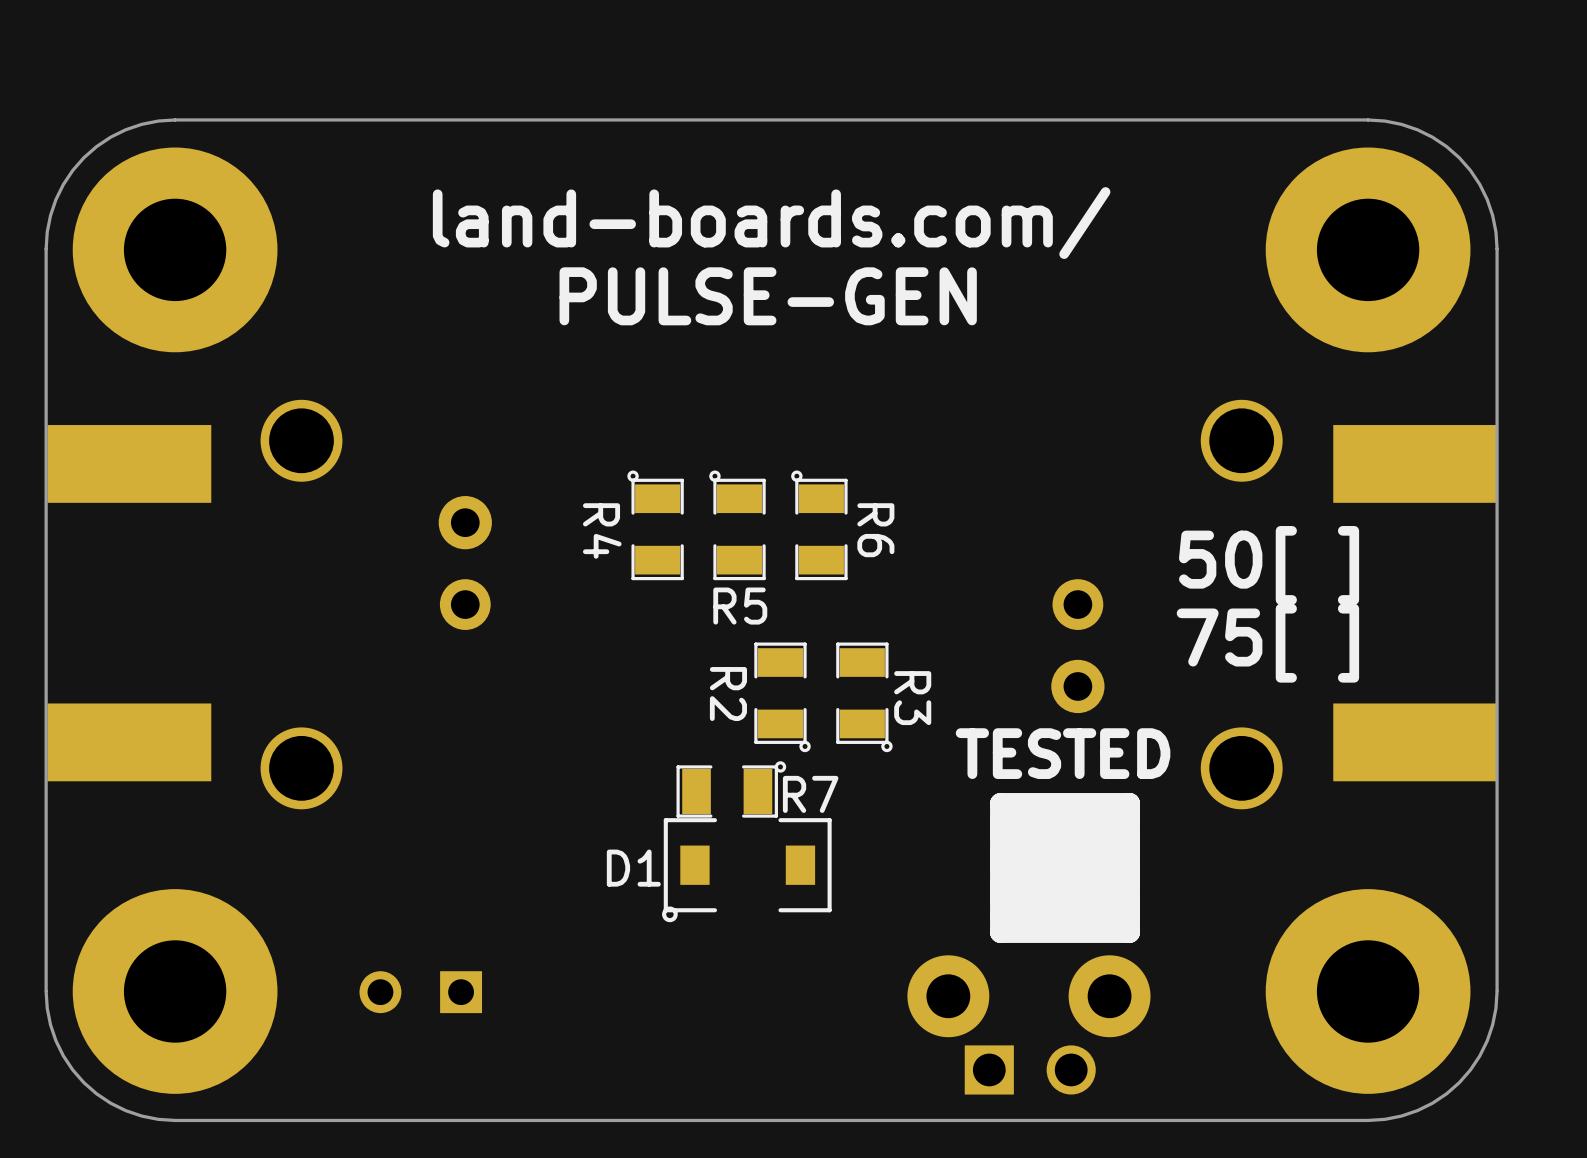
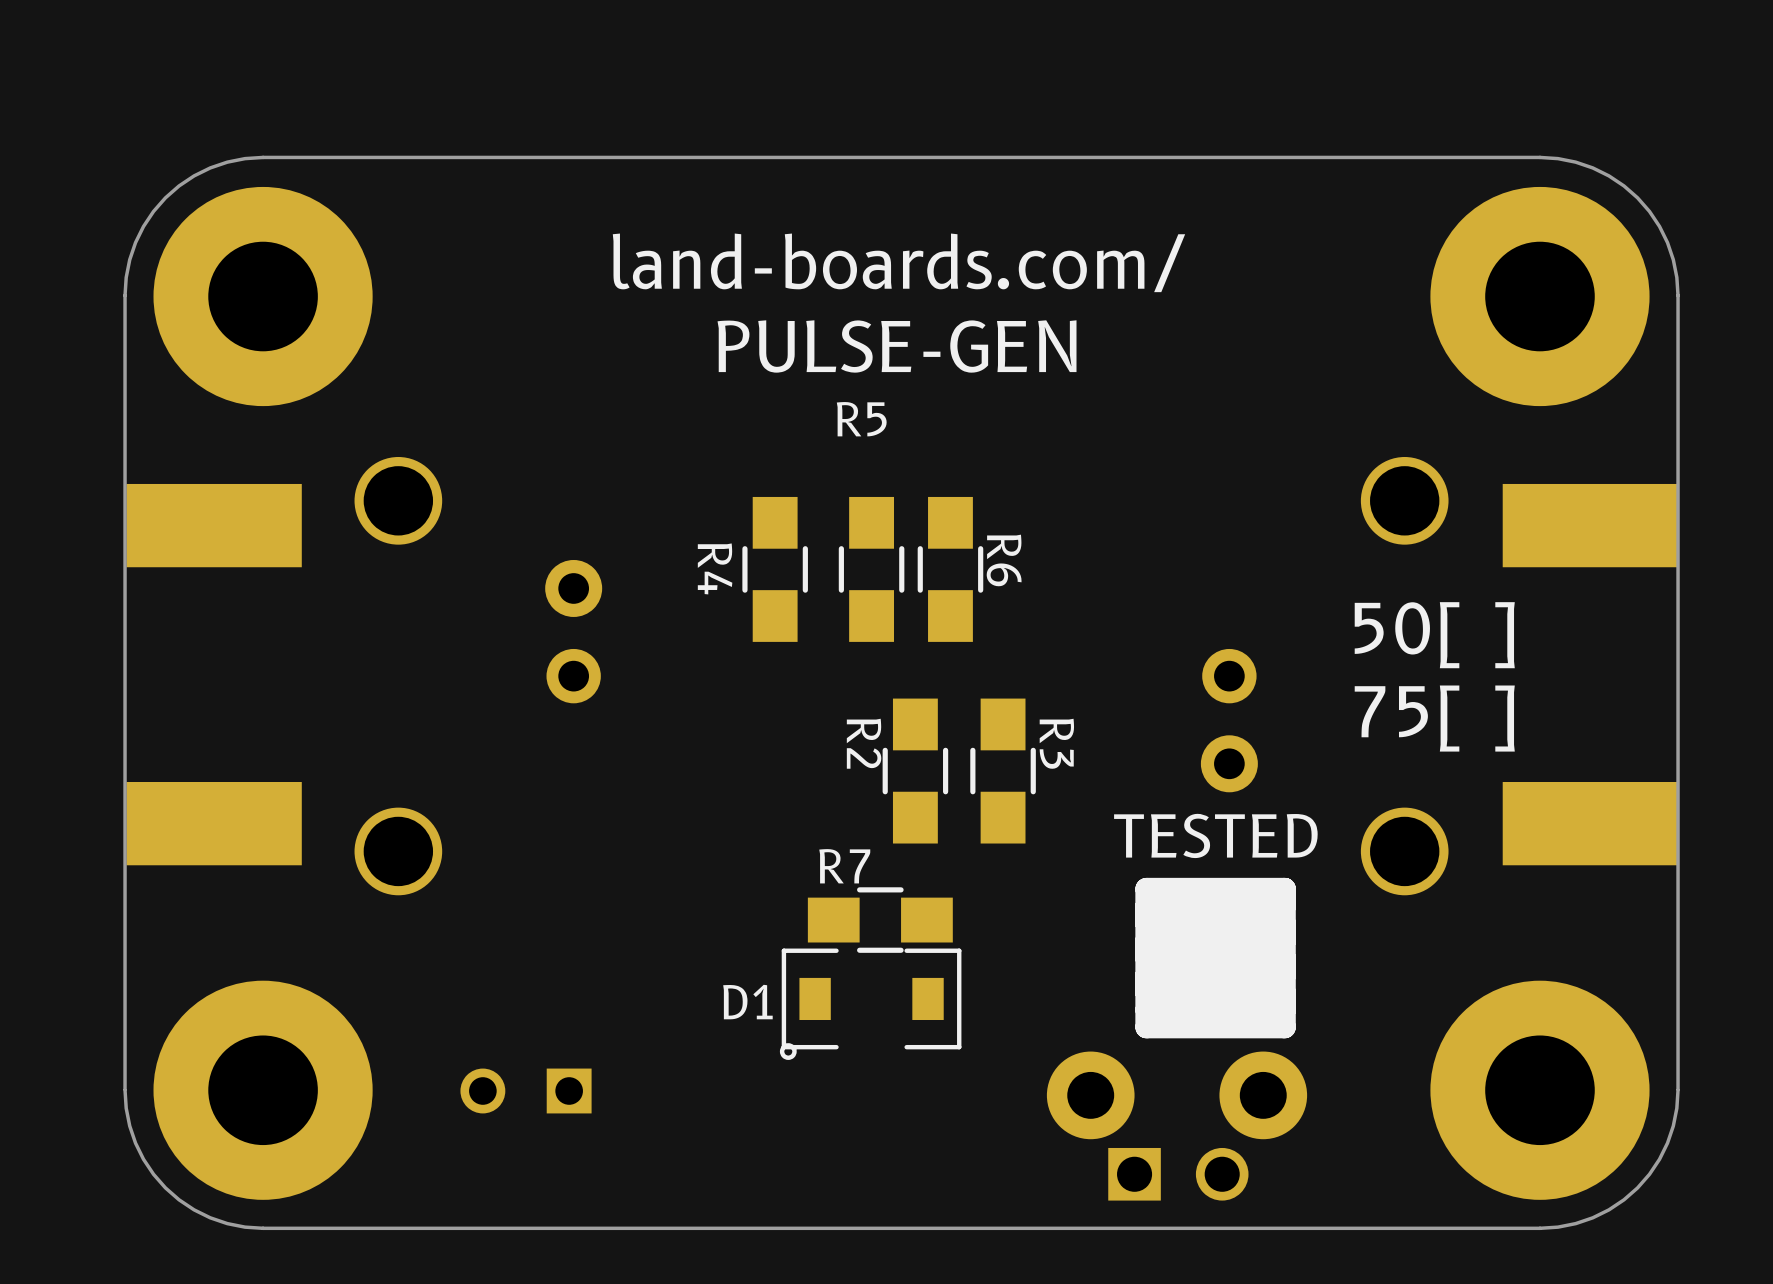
R4 footprint: [627, 470, 684, 581] -> [742, 496, 808, 642]
R5 footprint: [709, 470, 766, 581] -> [838, 496, 905, 642]
R6 footprint: [791, 470, 848, 581] -> [917, 496, 984, 642]
R5 name position: R5 (740, 606) -> R5 (861, 419)
R2 footprint: [754, 642, 811, 753] -> [882, 698, 949, 844]
R3 footprint: [836, 642, 893, 753] -> [970, 698, 1036, 844]
R7 footprint: [676, 761, 787, 818] -> [807, 887, 953, 953]
R7 name position: R7 (810, 794) -> R7 (844, 866)
D1 position: (746, 870) -> (870, 1004)

